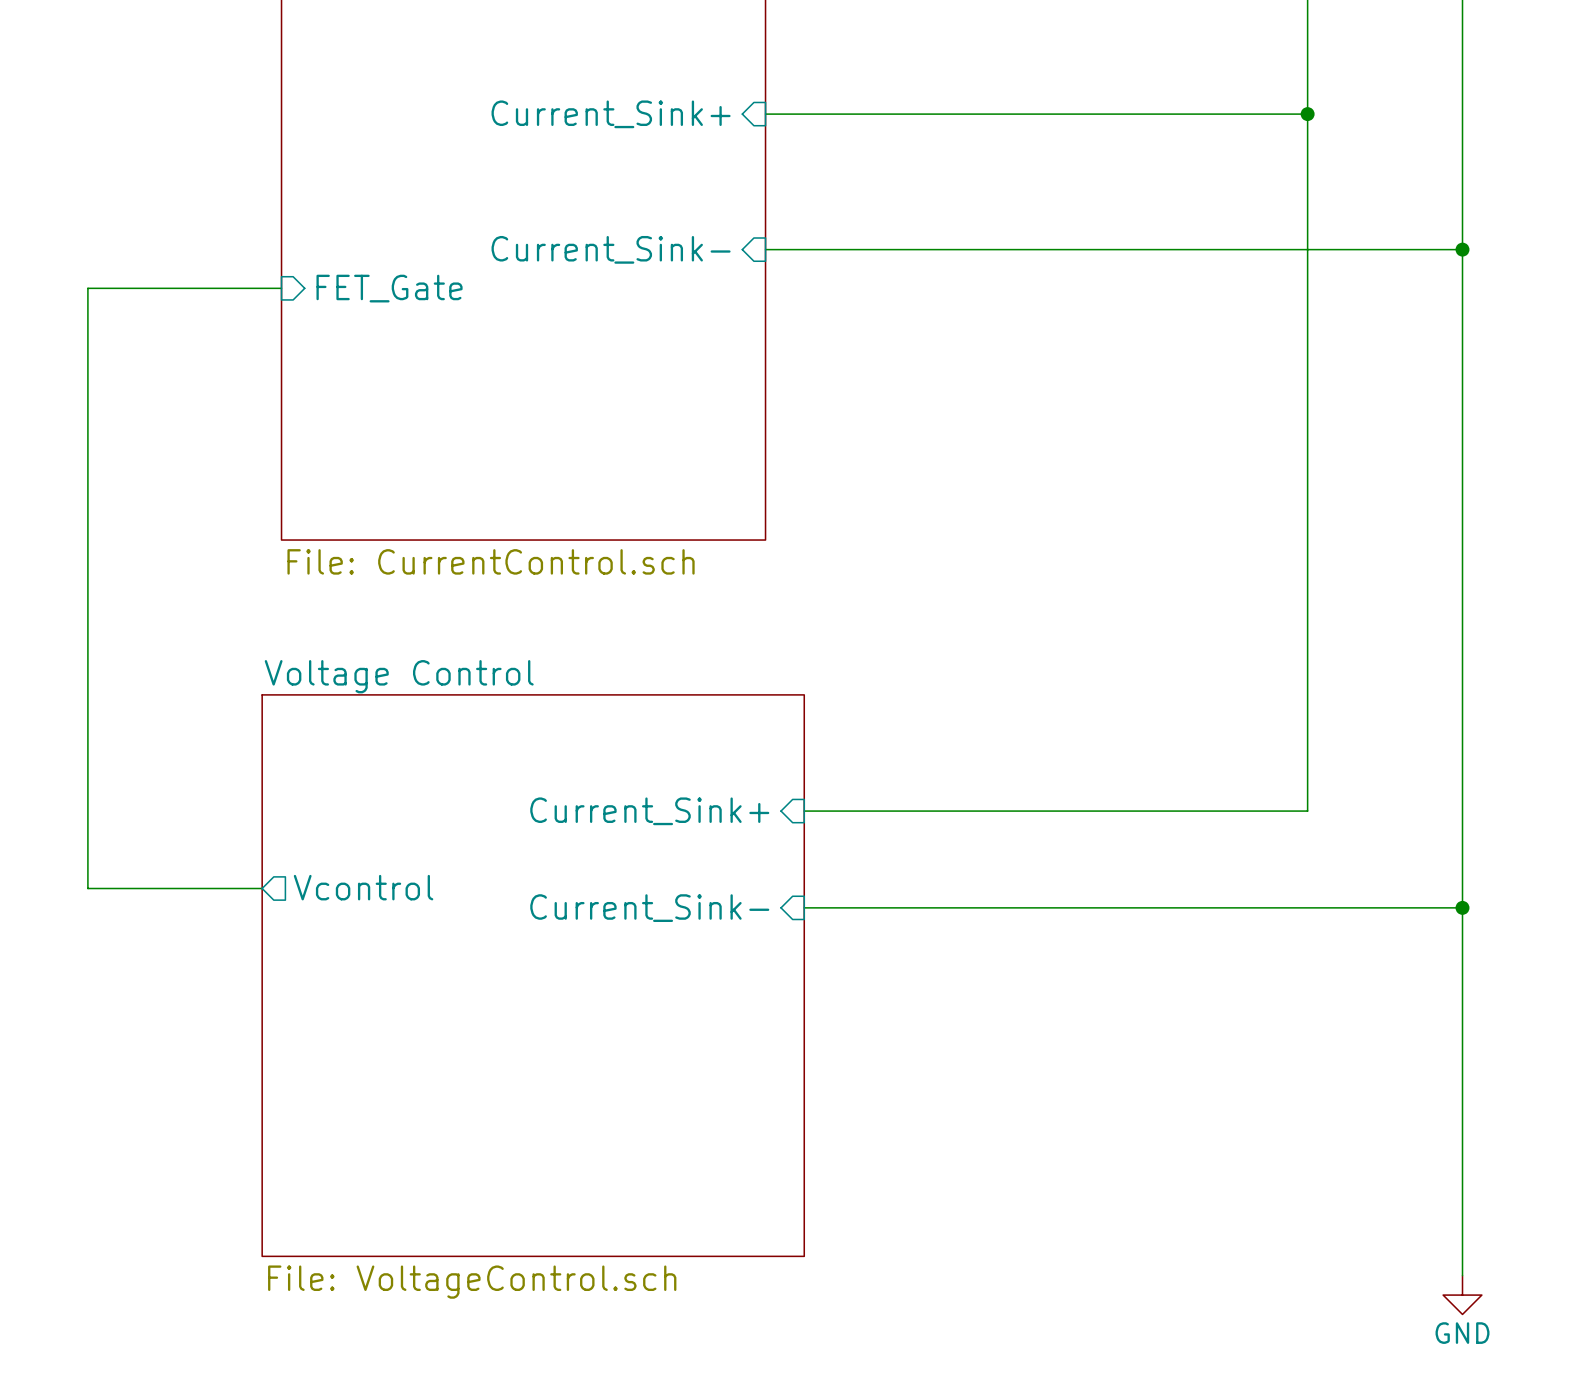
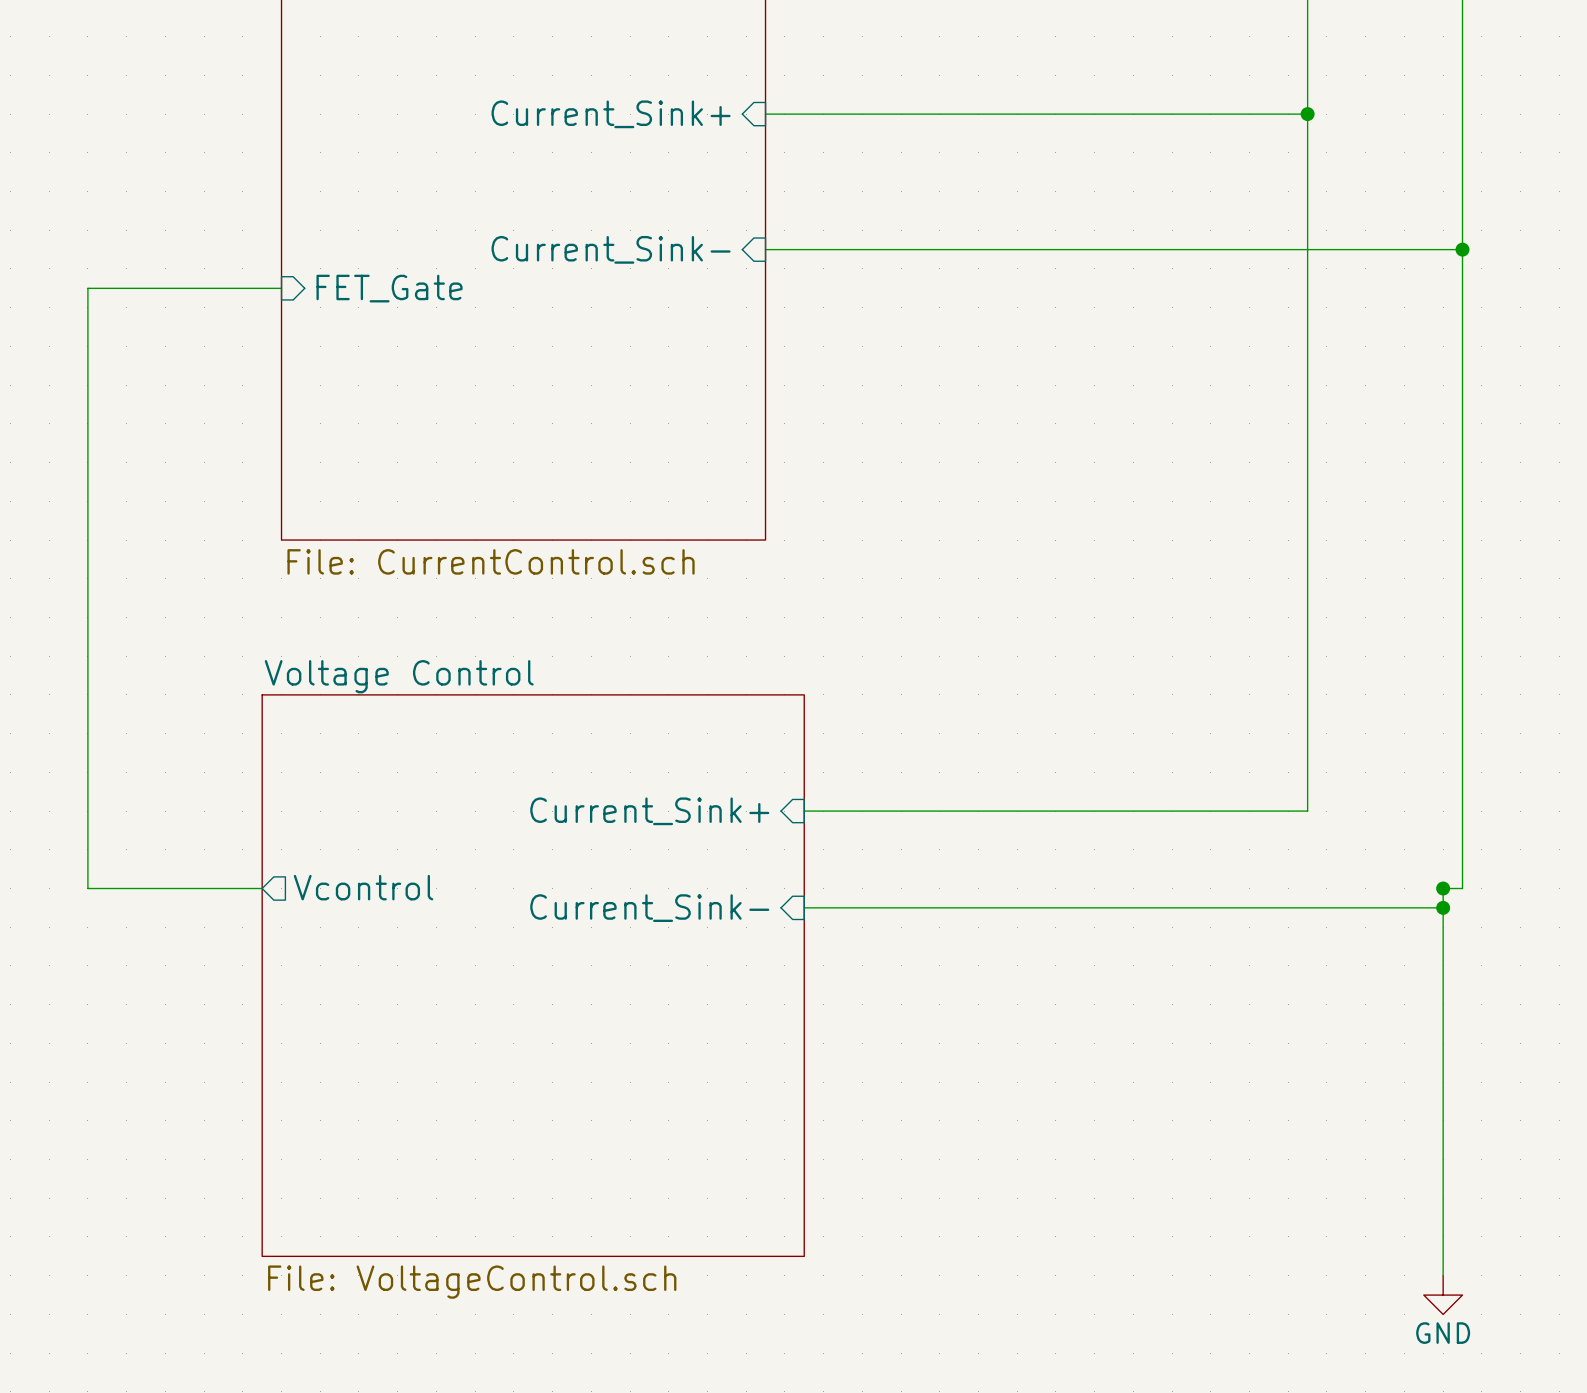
junction: none -> (1443, 888)
wire: (1462, 888) (1462, 1275) -> (1462, 888) (1443, 888) (1443, 1275)
wire: (1443, 907) (1462, 907) -> none
junction: none -> (1443, 907)
junction: (1462, 907) -> none
power symbol position: GND (1462, 1295) -> GND (1443, 1295)

